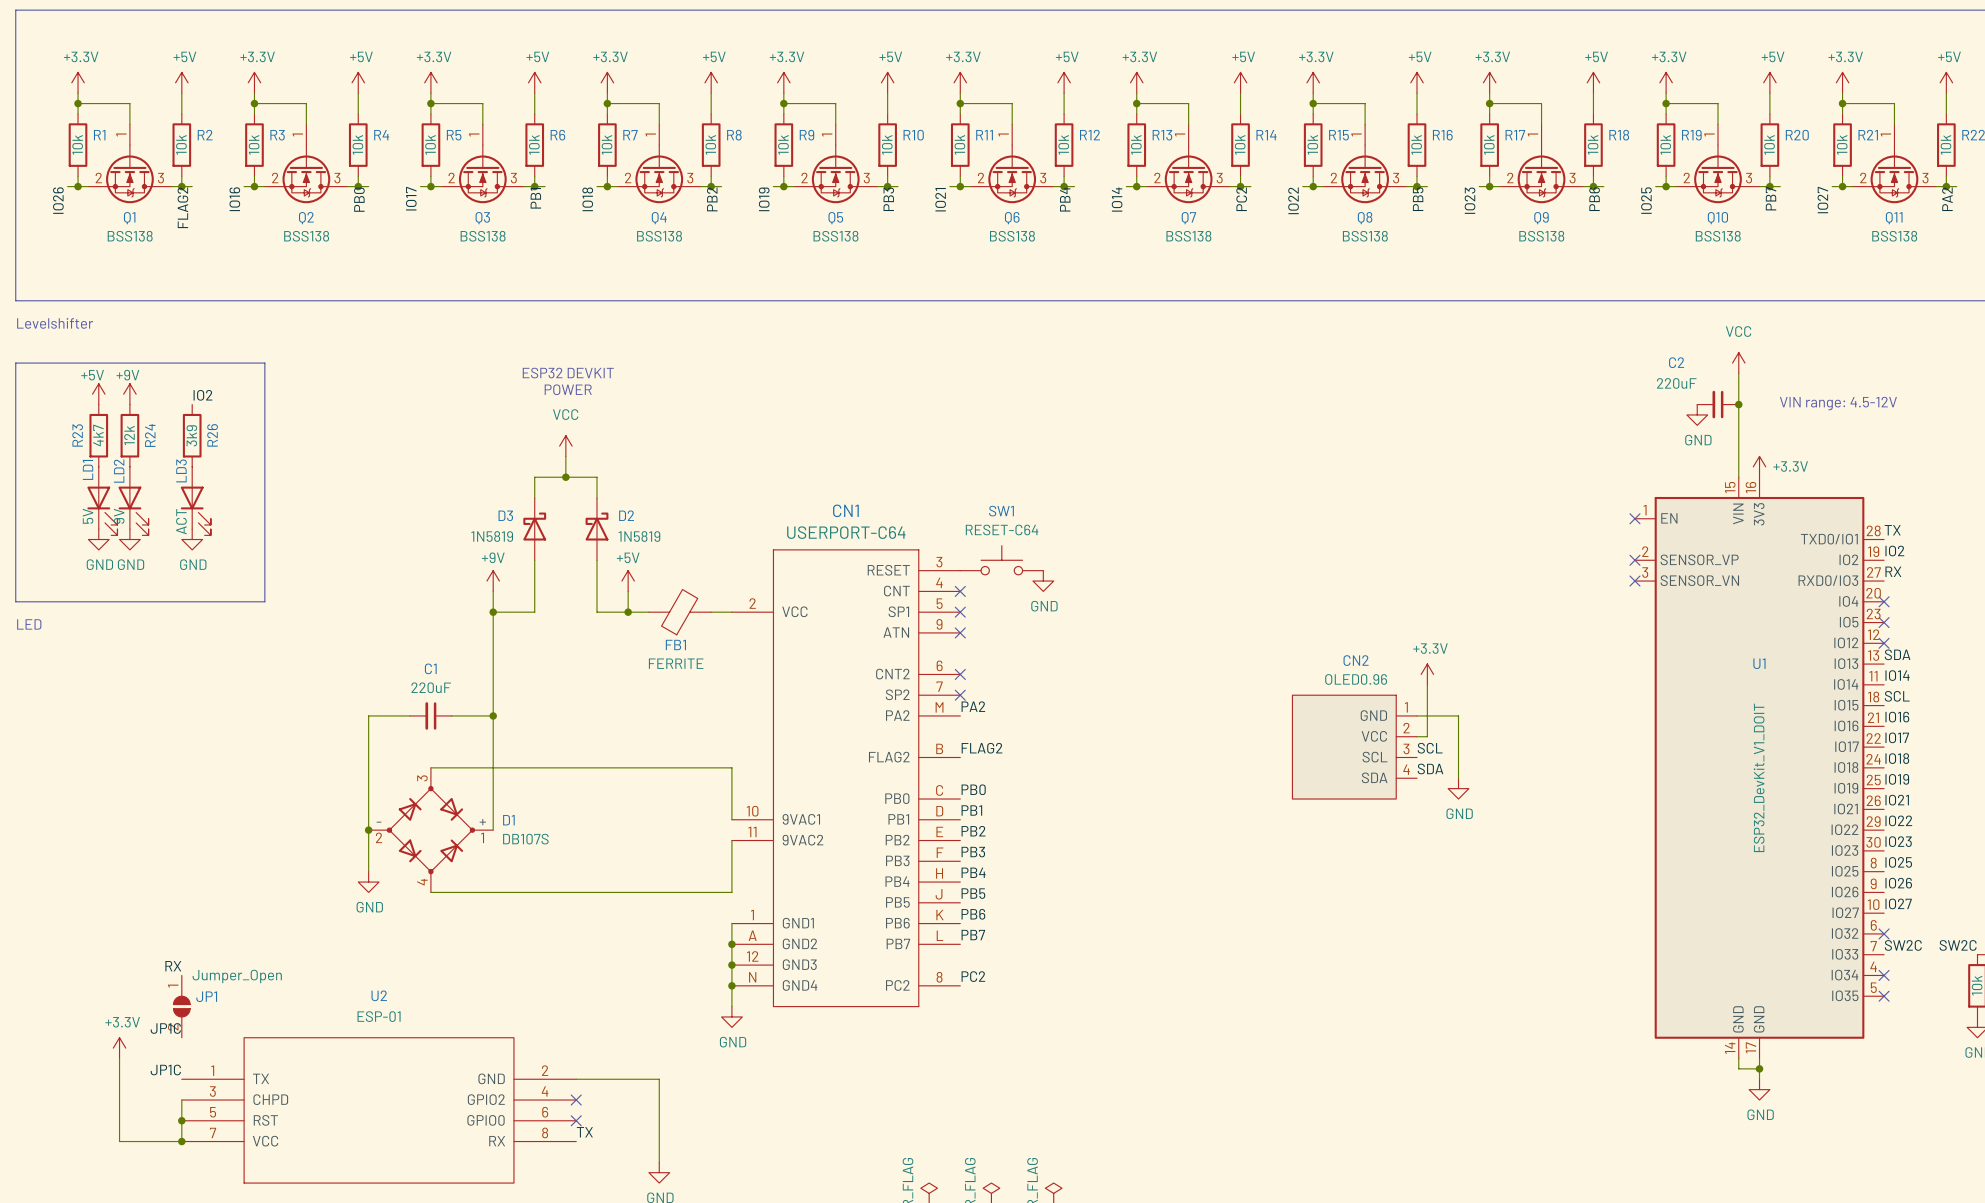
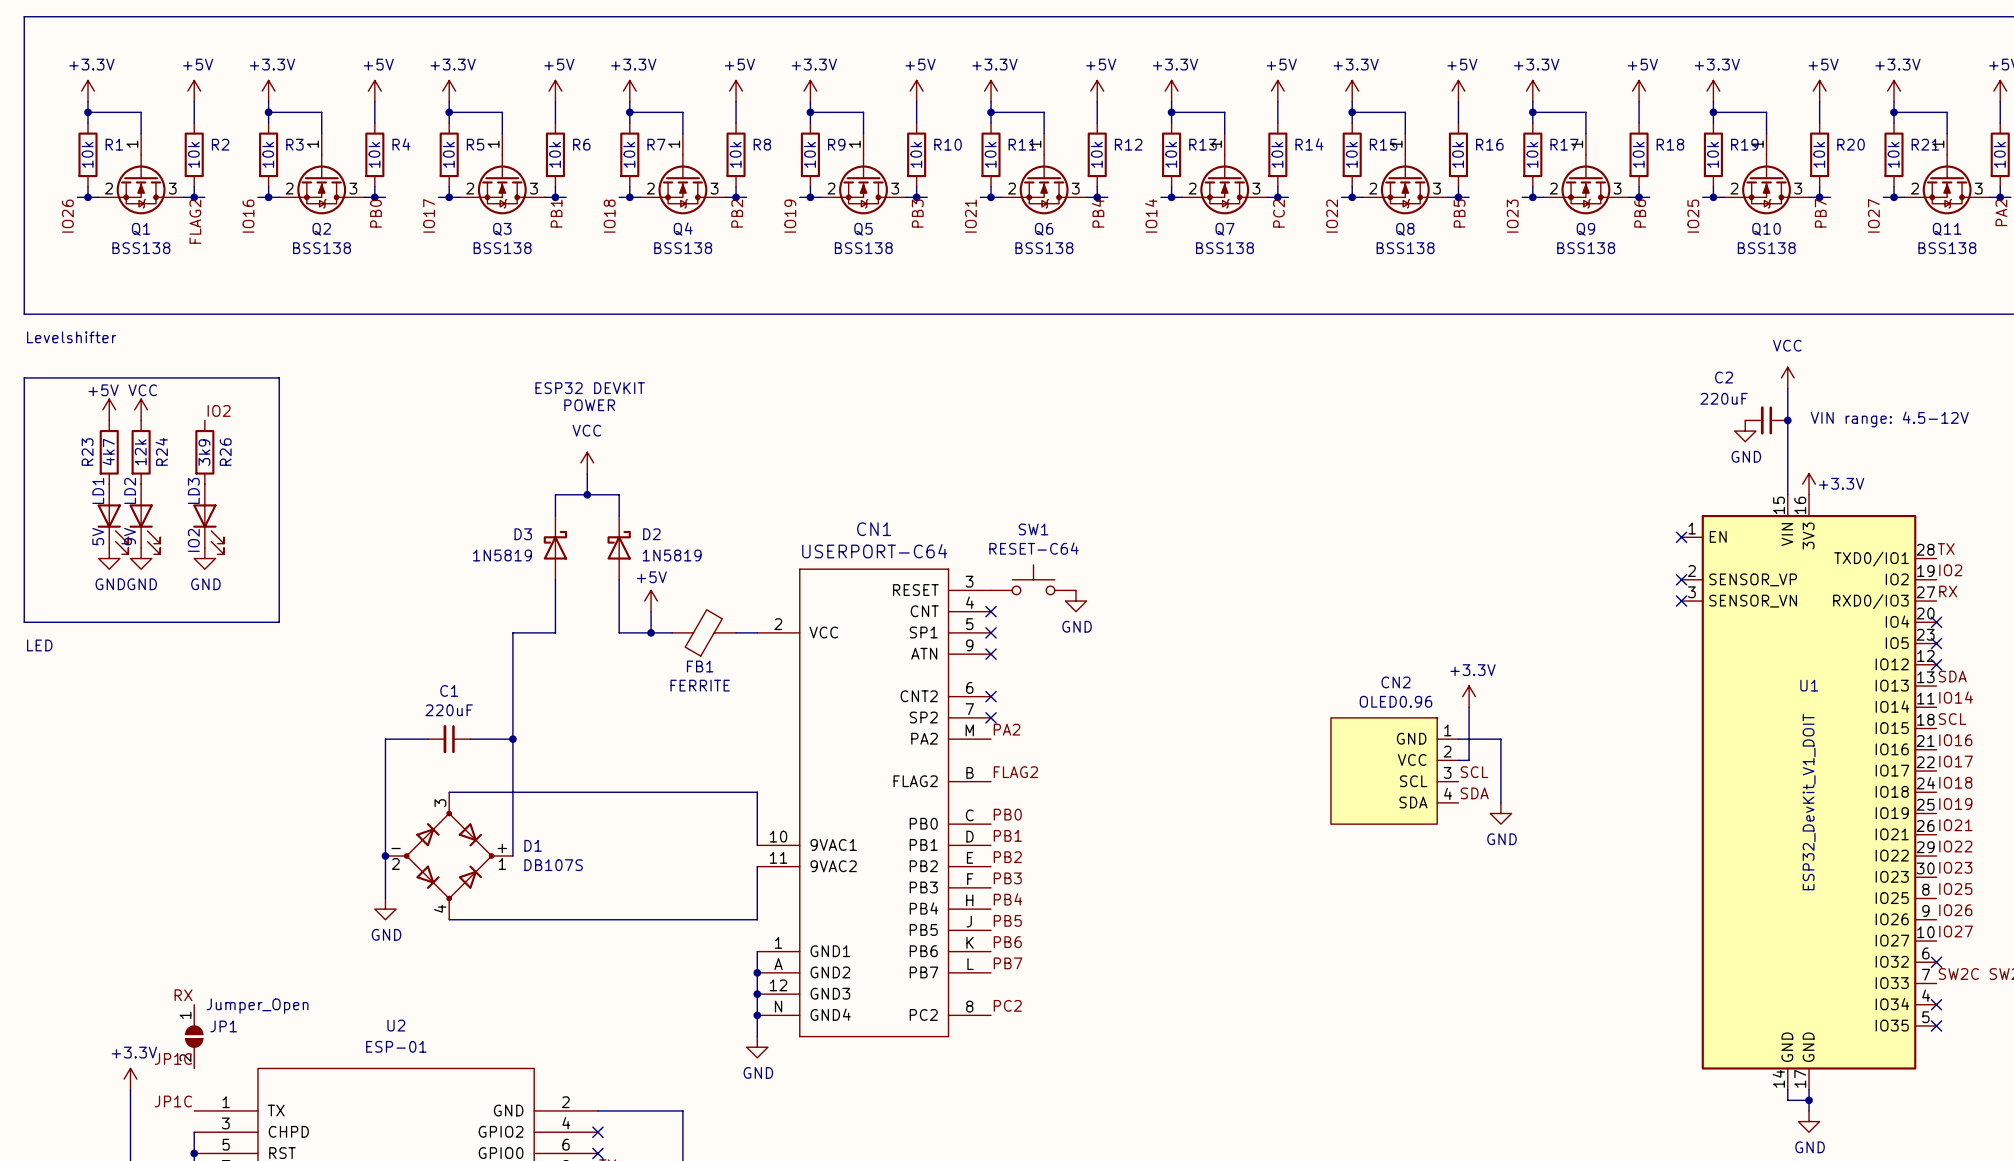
power symbol: +9V (129, 394) -> VCC (141, 409)
LD3 value: ACT (181, 521) -> IO2 (193, 540)
power symbol: +9V (493, 581) -> none
wire: (493, 591) (493, 612) -> none
junction: (493, 612) -> none

